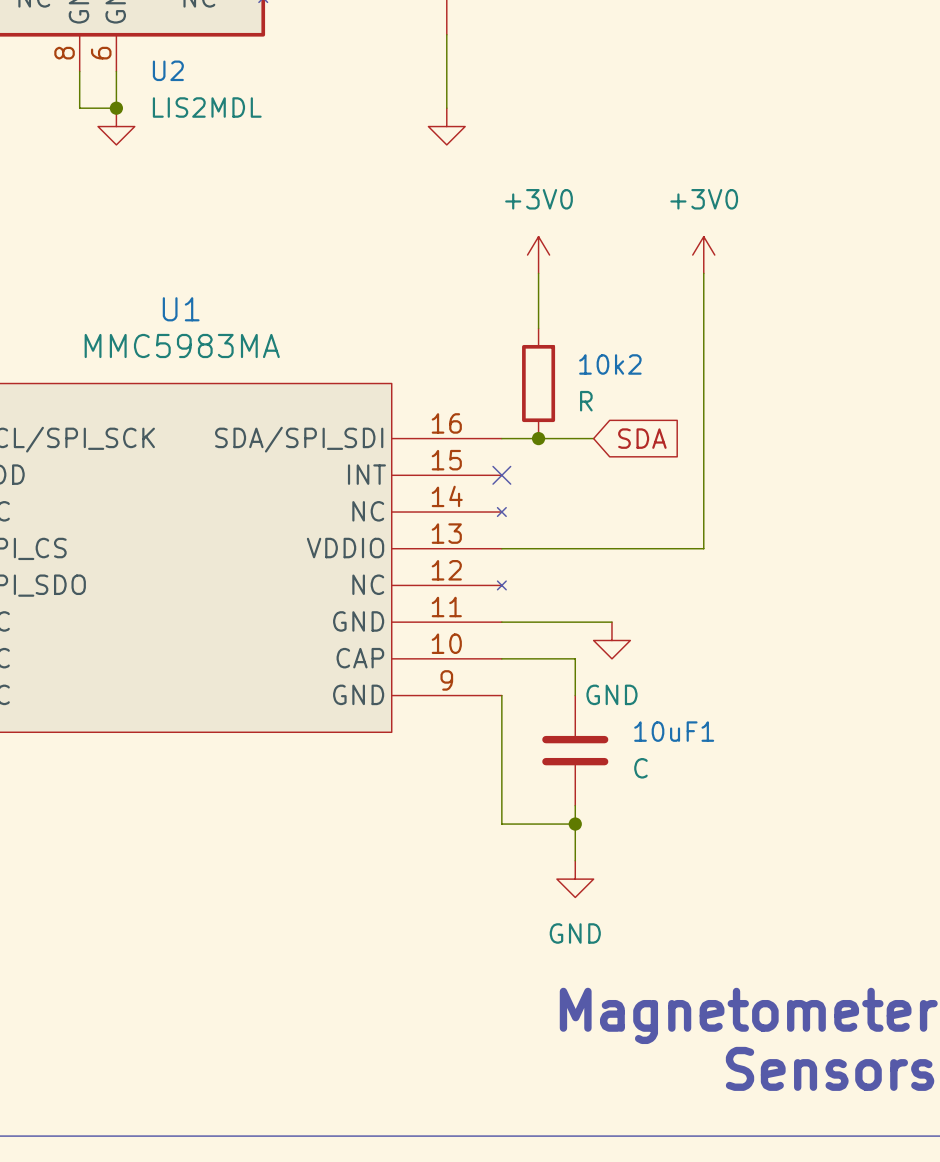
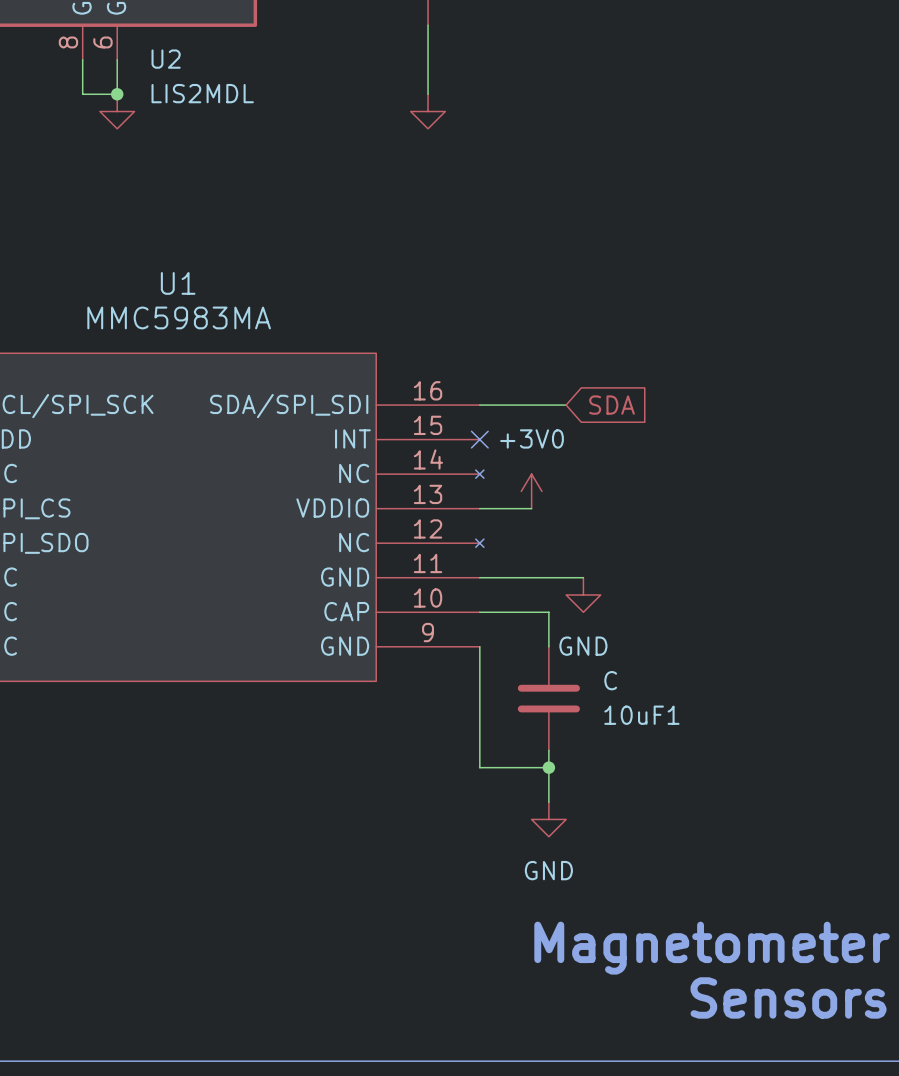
power symbol: +3V0 (538, 255) -> none
power symbol: +3V0 (703, 255) -> none
wire: (538, 273) (538, 328) -> none
wire: (703, 273) (703, 548) (556, 548) -> none
10k2: R (538, 383) -> none
junction: (538, 438) -> none
power symbol: none -> +3V0 (531, 491)
10uF1 name: 10uF1 (674, 731) -> C (610, 680)
10uF1 value: C (640, 768) -> 10uF1 (641, 715)

